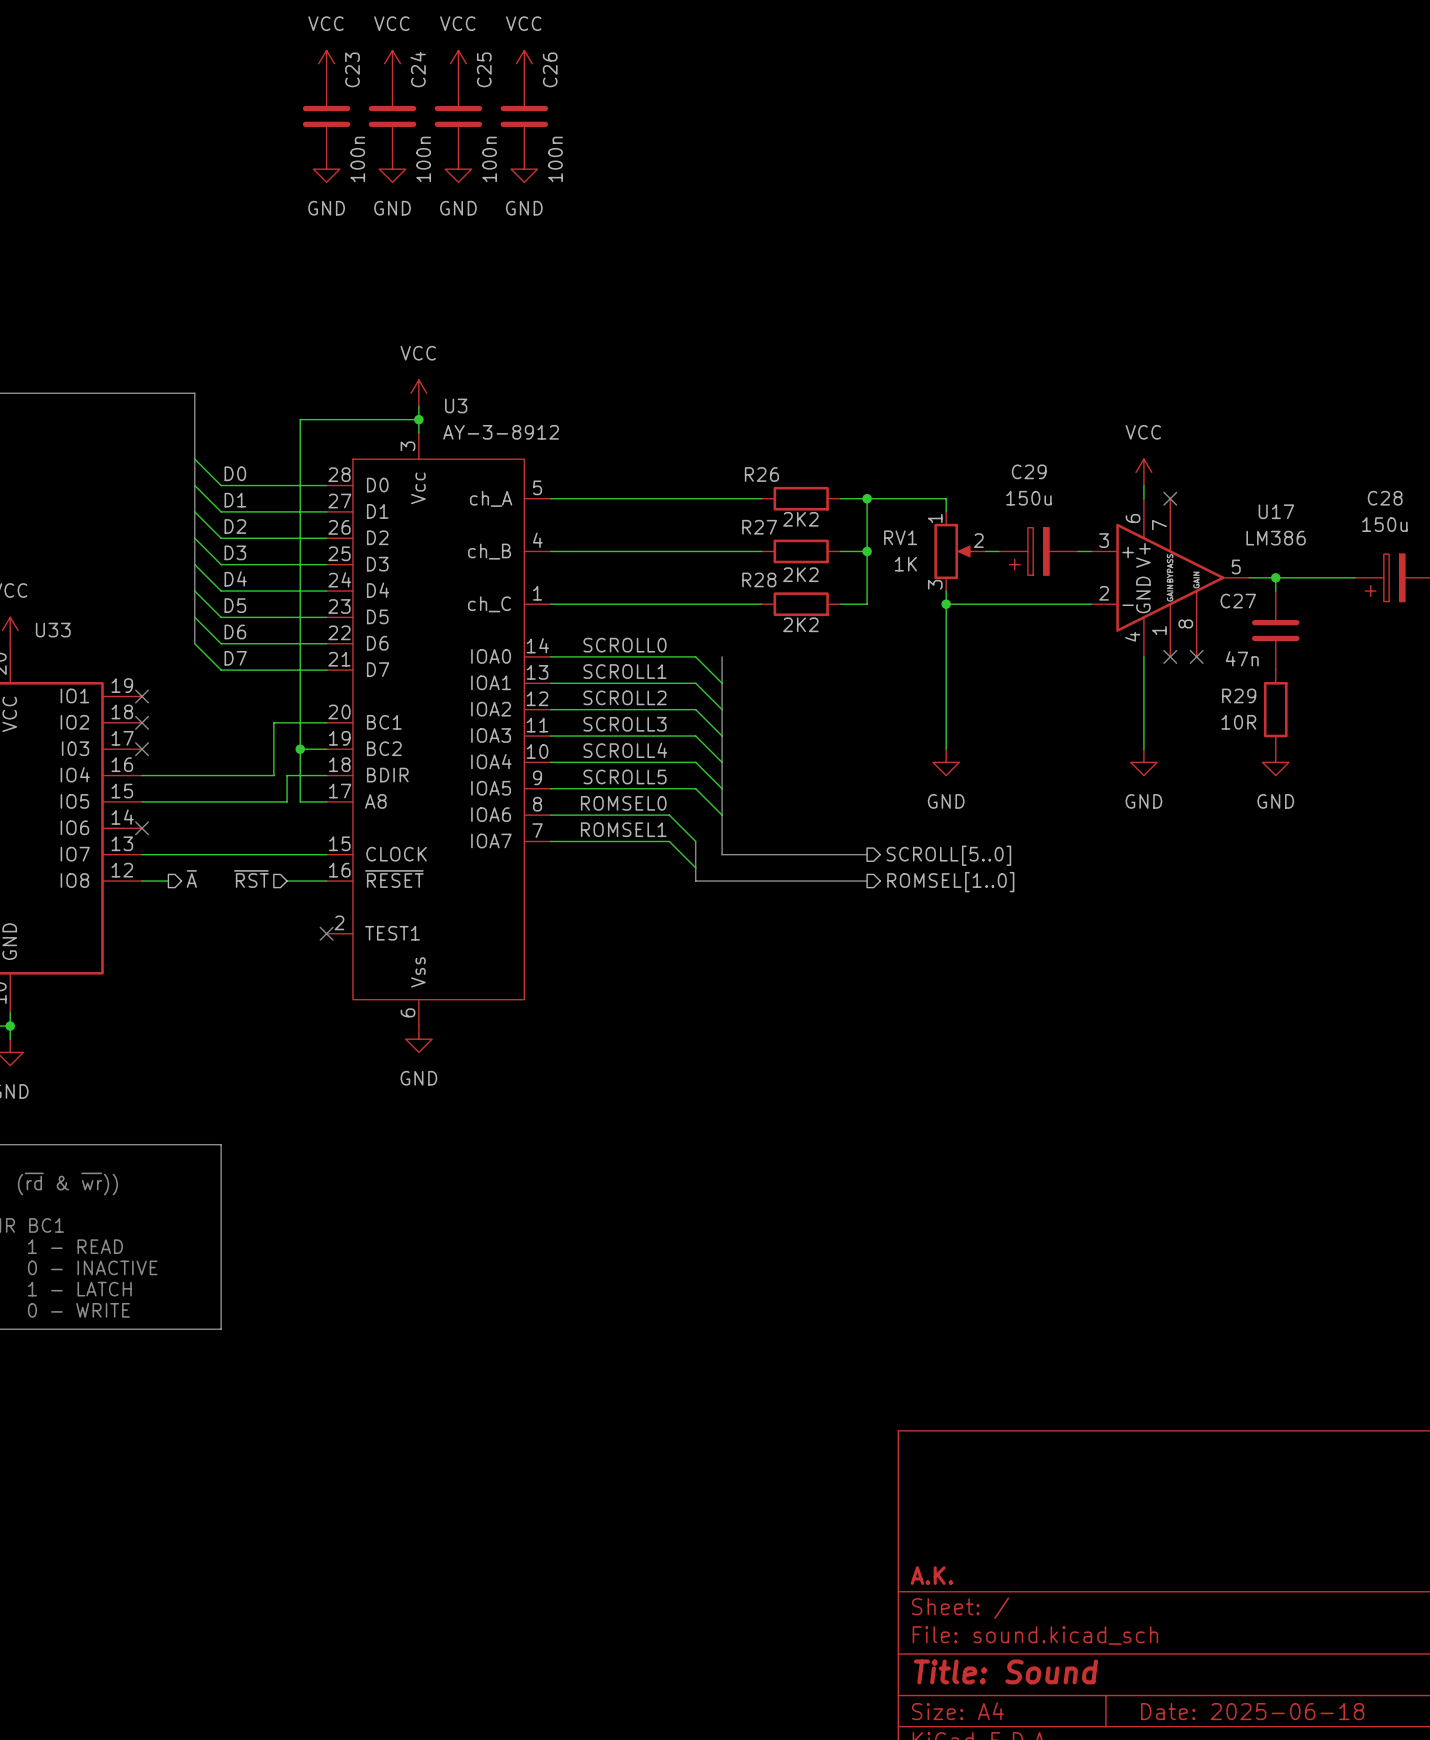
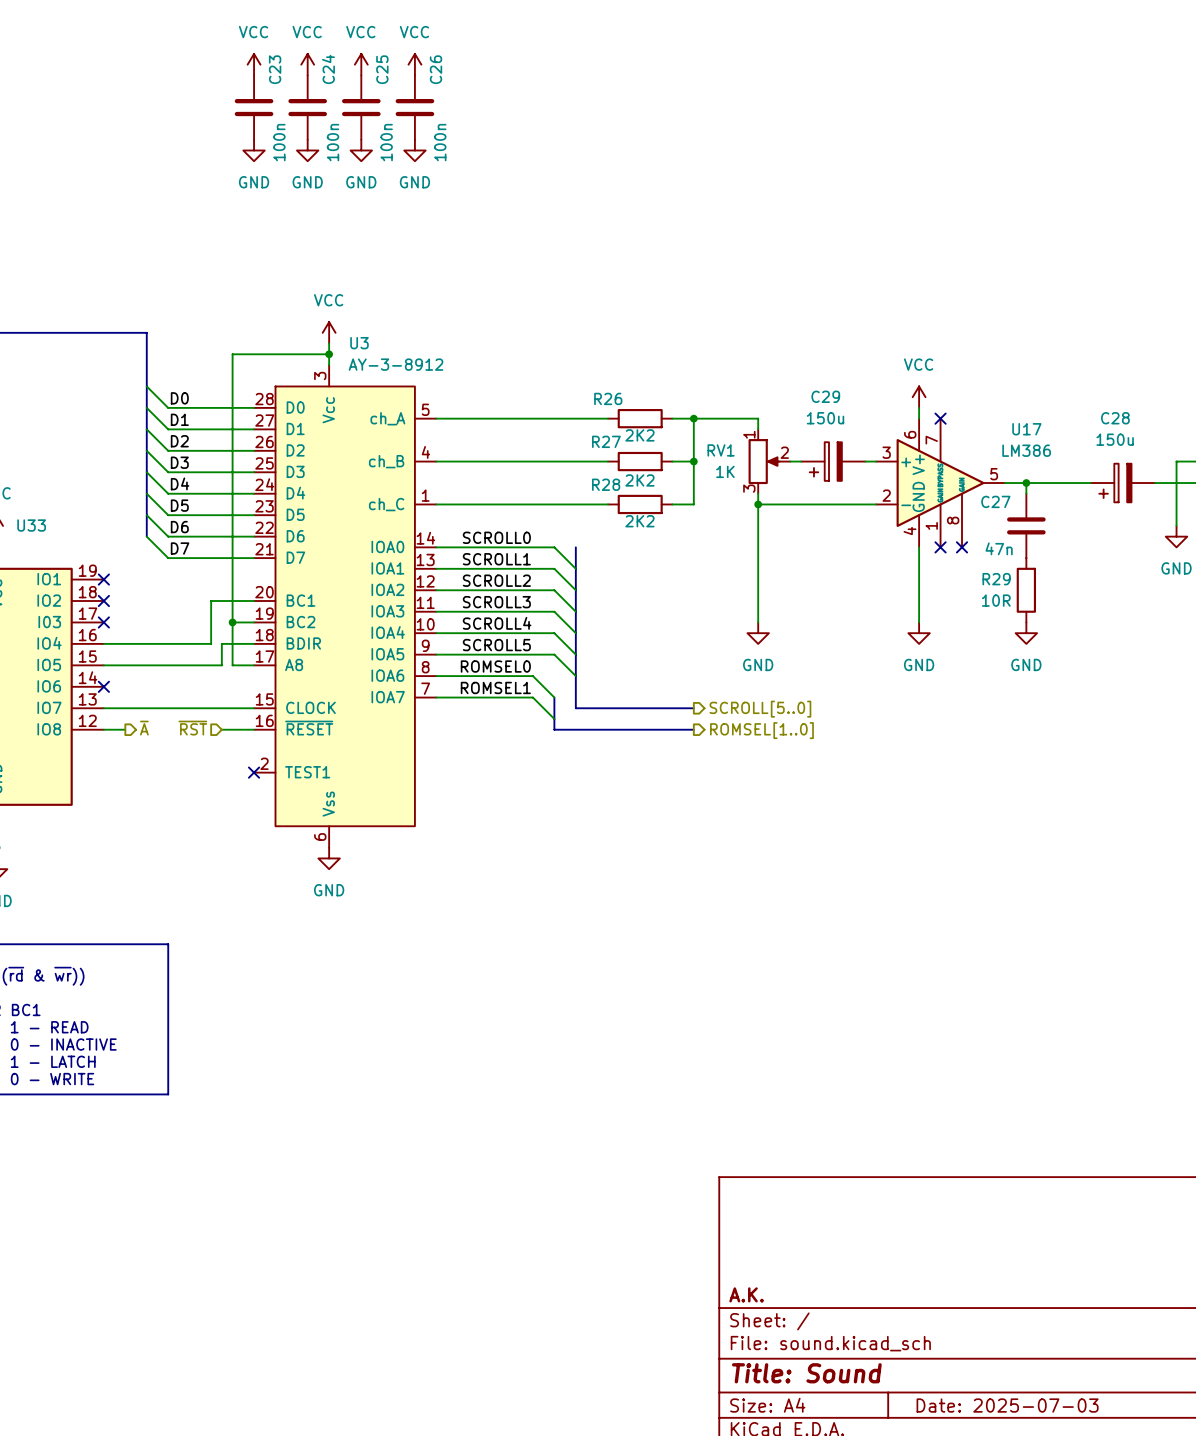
title block: Date: 2025-06-18 (1252, 1711) -> Date: 2025-07-03 (1007, 1405)

